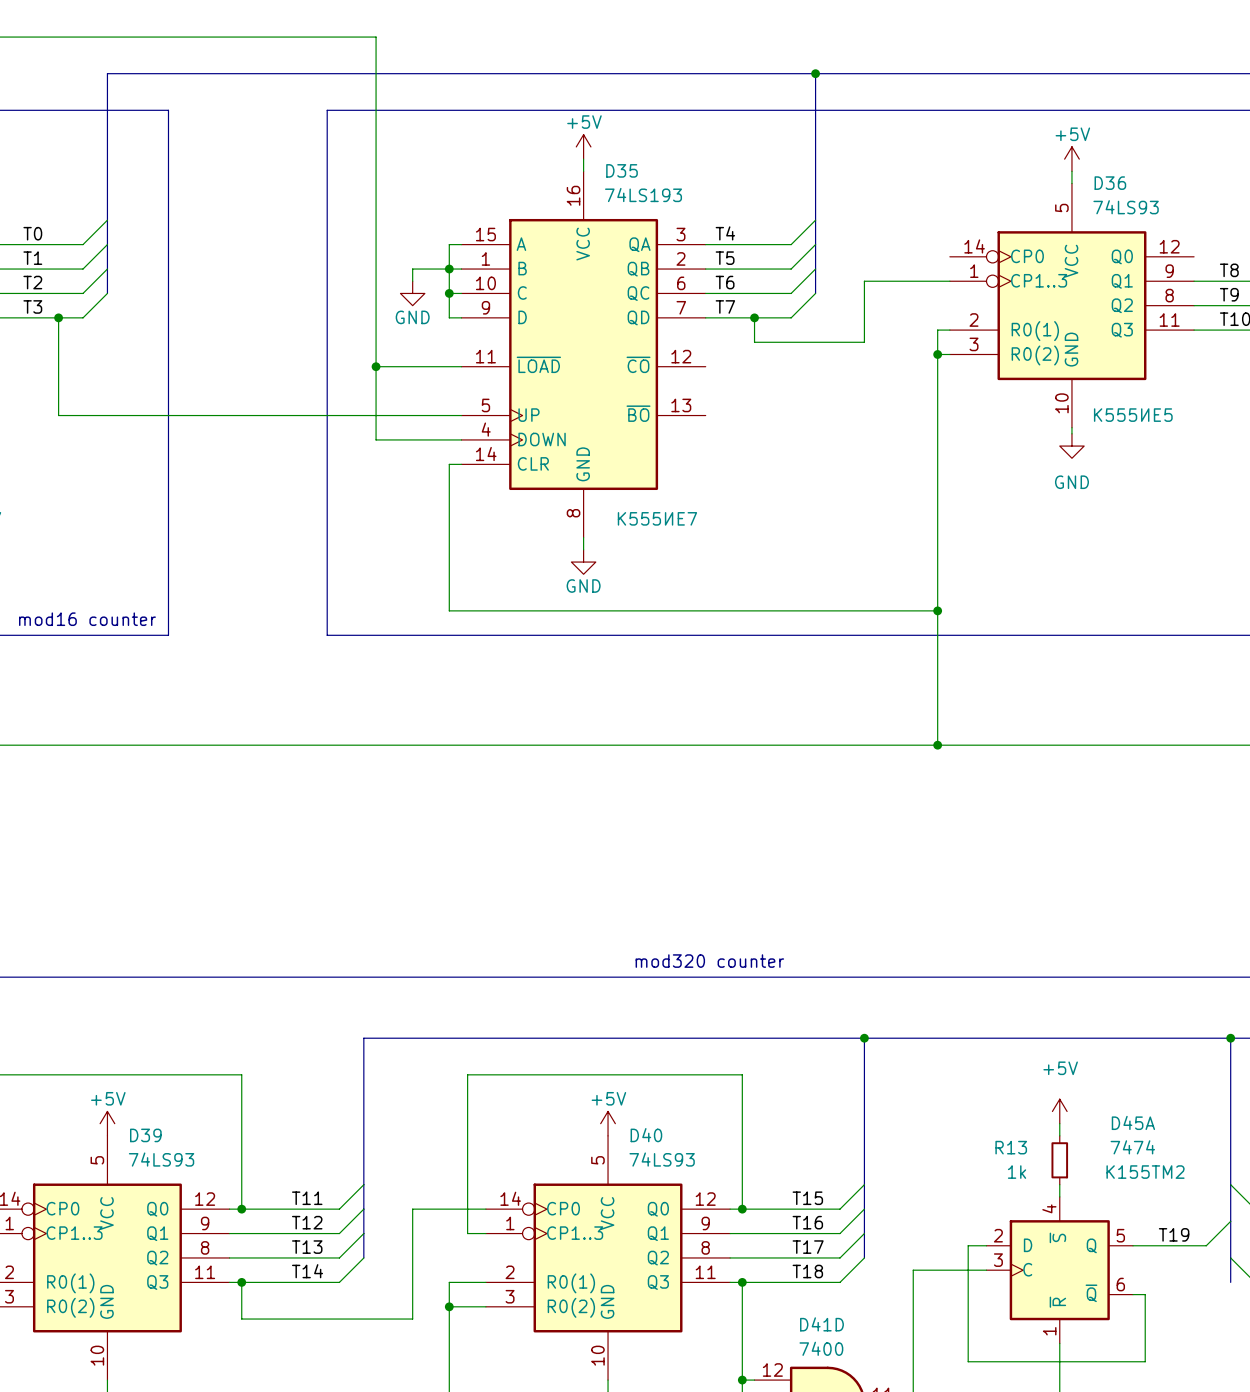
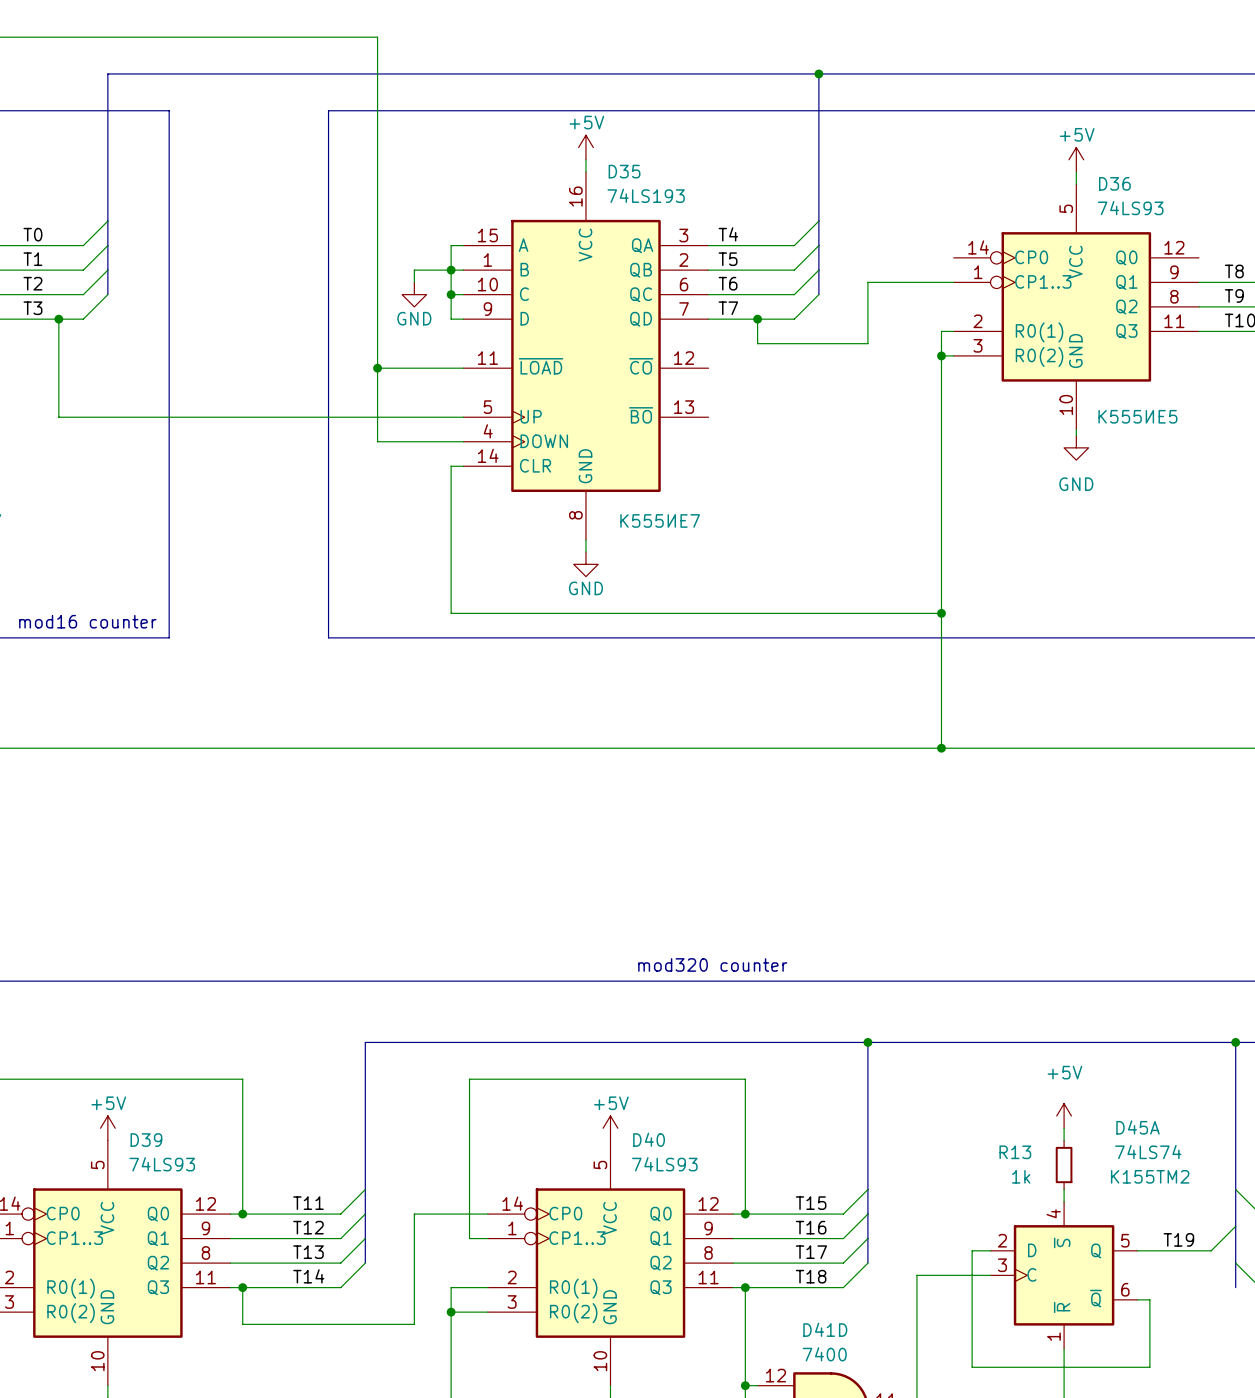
D45A value: 7474 (1132, 1147) -> 74LS74 (1148, 1152)

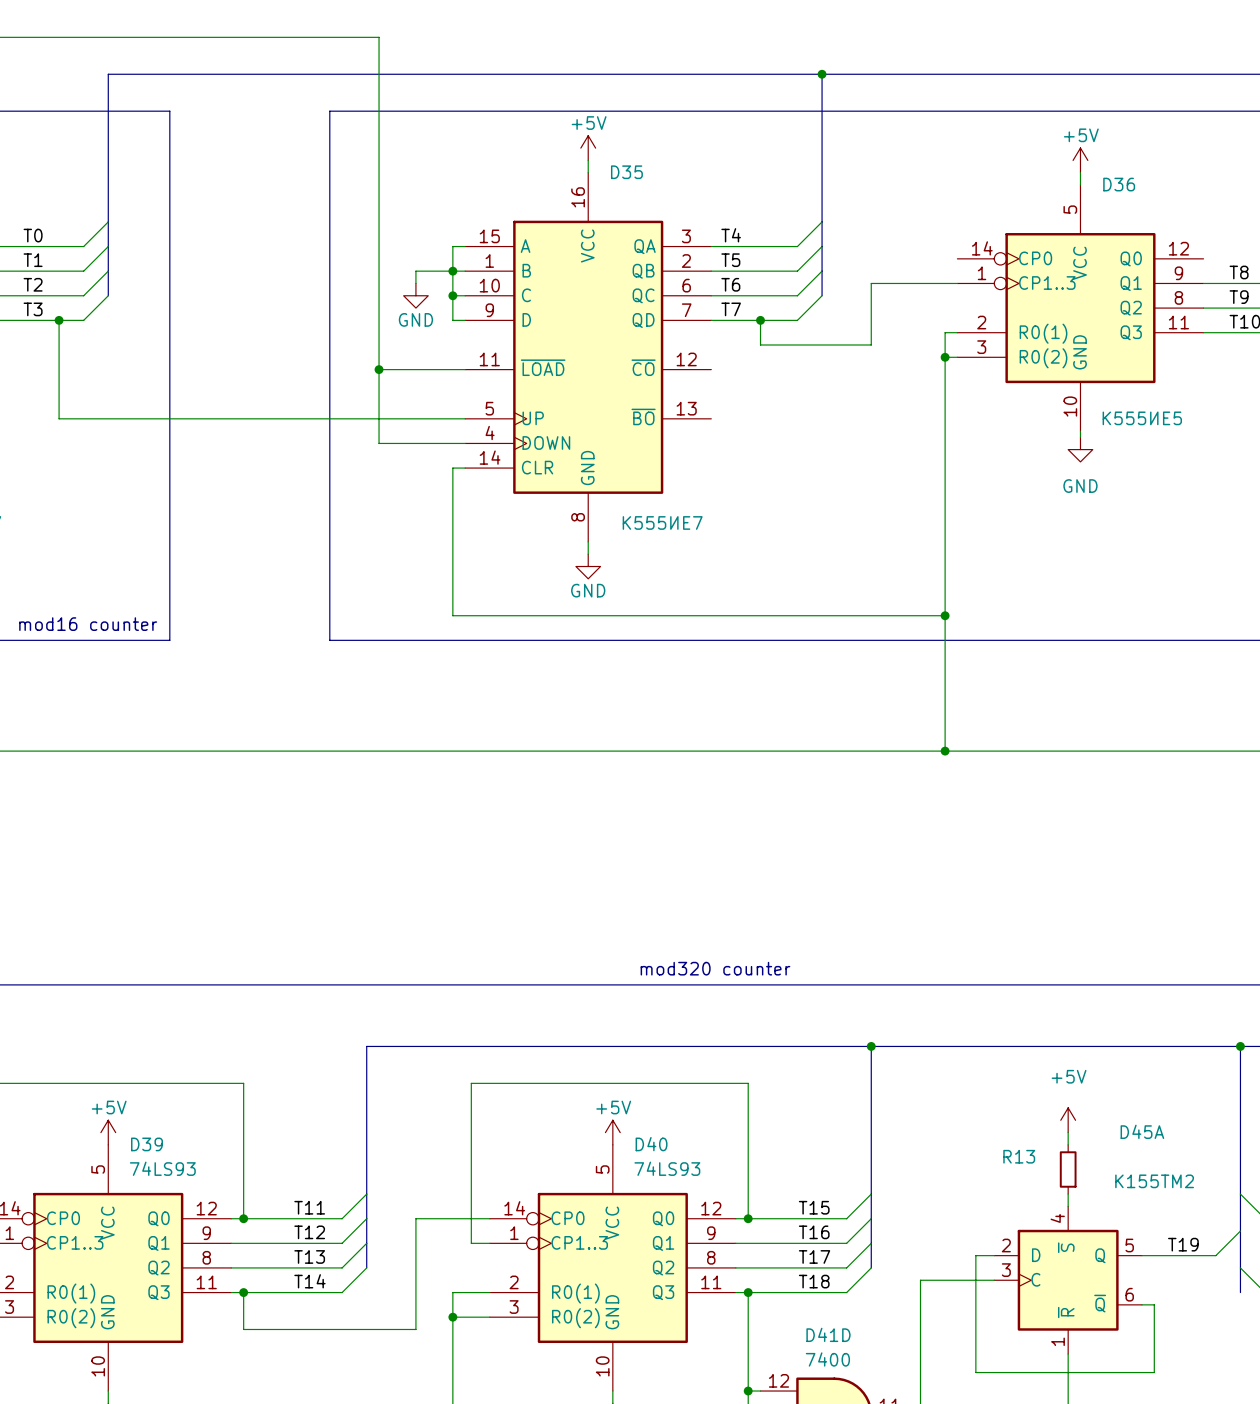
D35 value: 74LS193 (646, 195) -> none
D36 value: 74LS93 (1130, 208) -> none
D45A value: 74LS74 (1148, 1152) -> none
R13 value: 1k (1021, 1176) -> none

